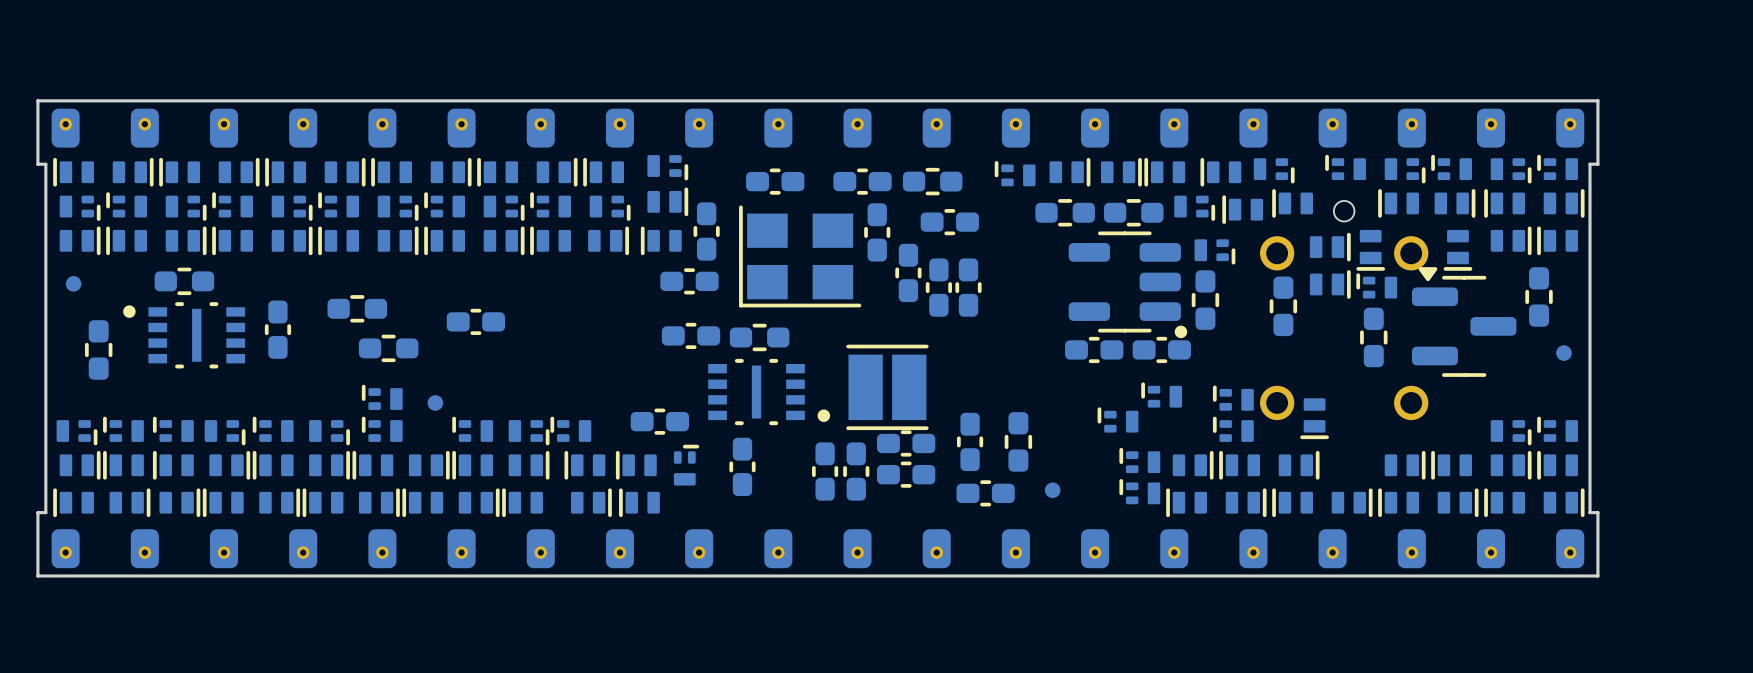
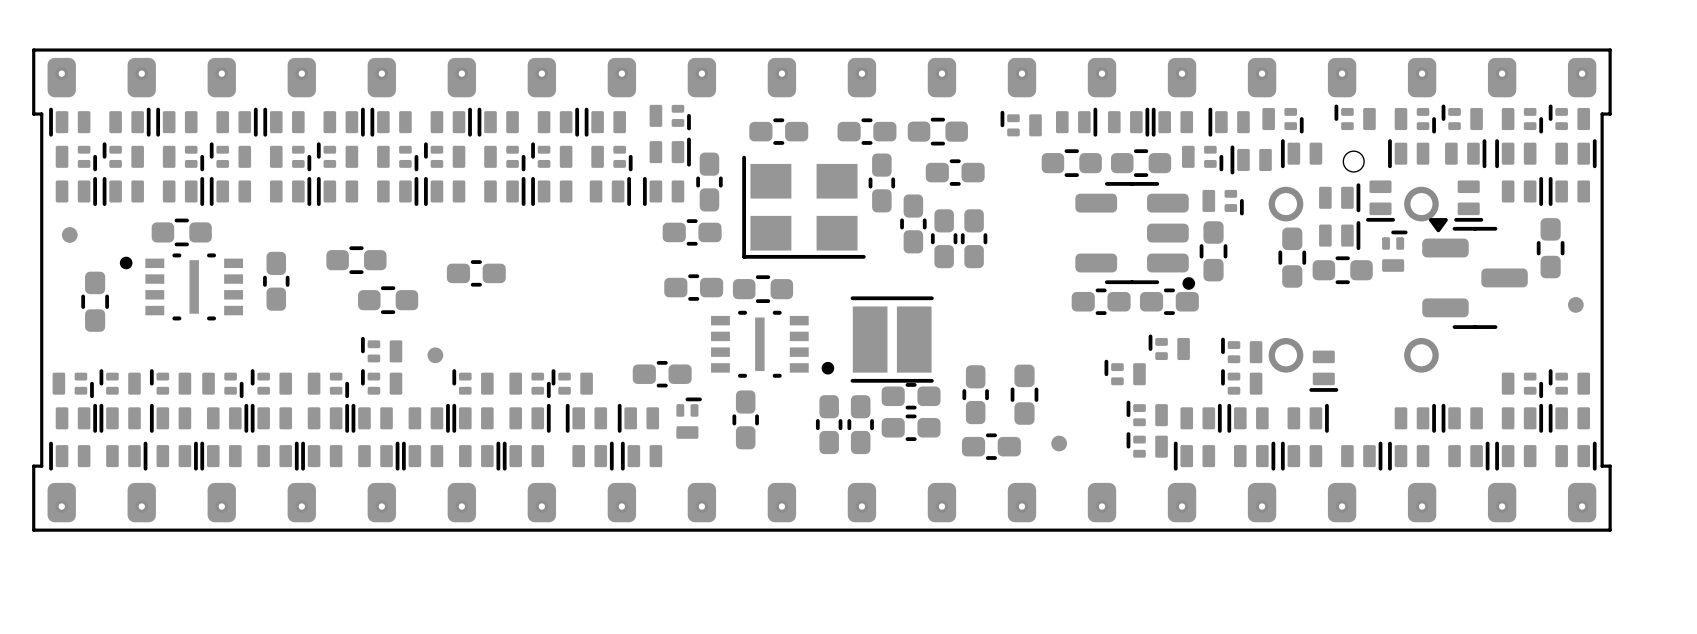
part rotation: 0° (1376, 285) -> 90° clockwise (1394, 251)
part rotation: 0° (1373, 337) -> 90° clockwise (1342, 270)
part position: (1373, 337) -> (1342, 270)

